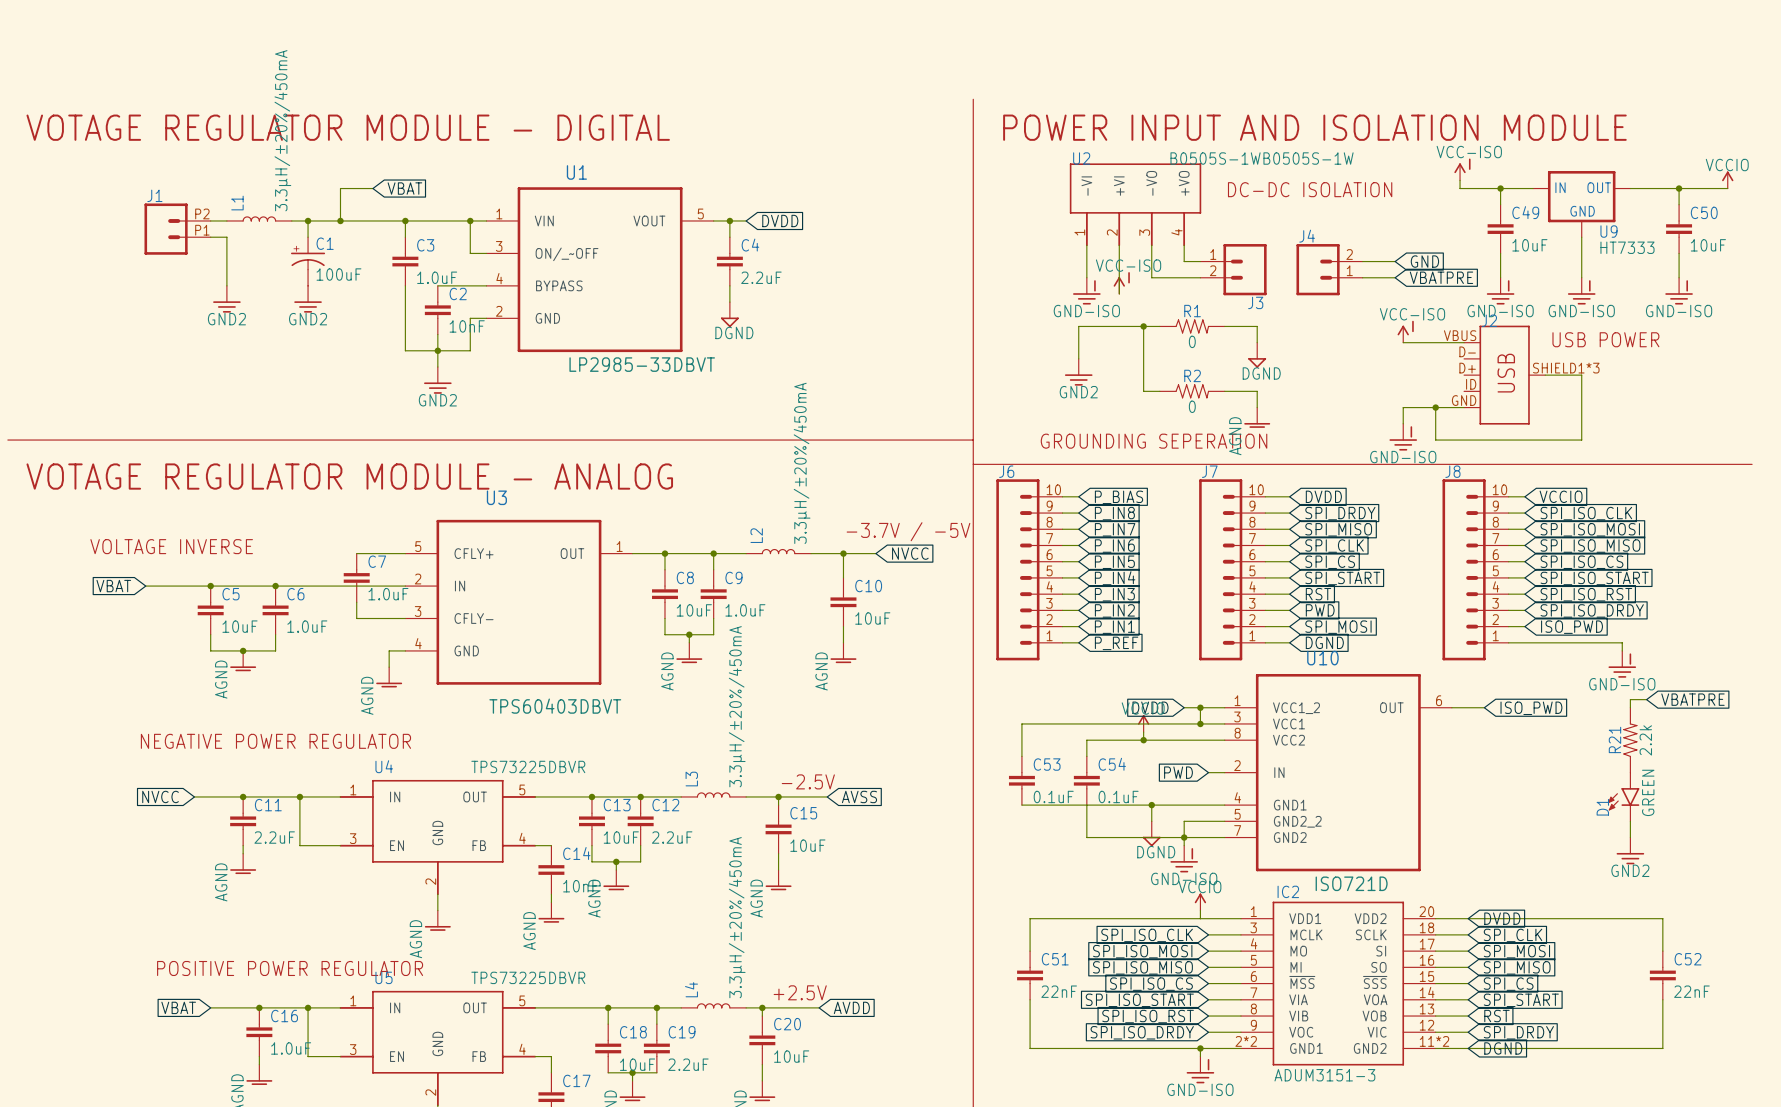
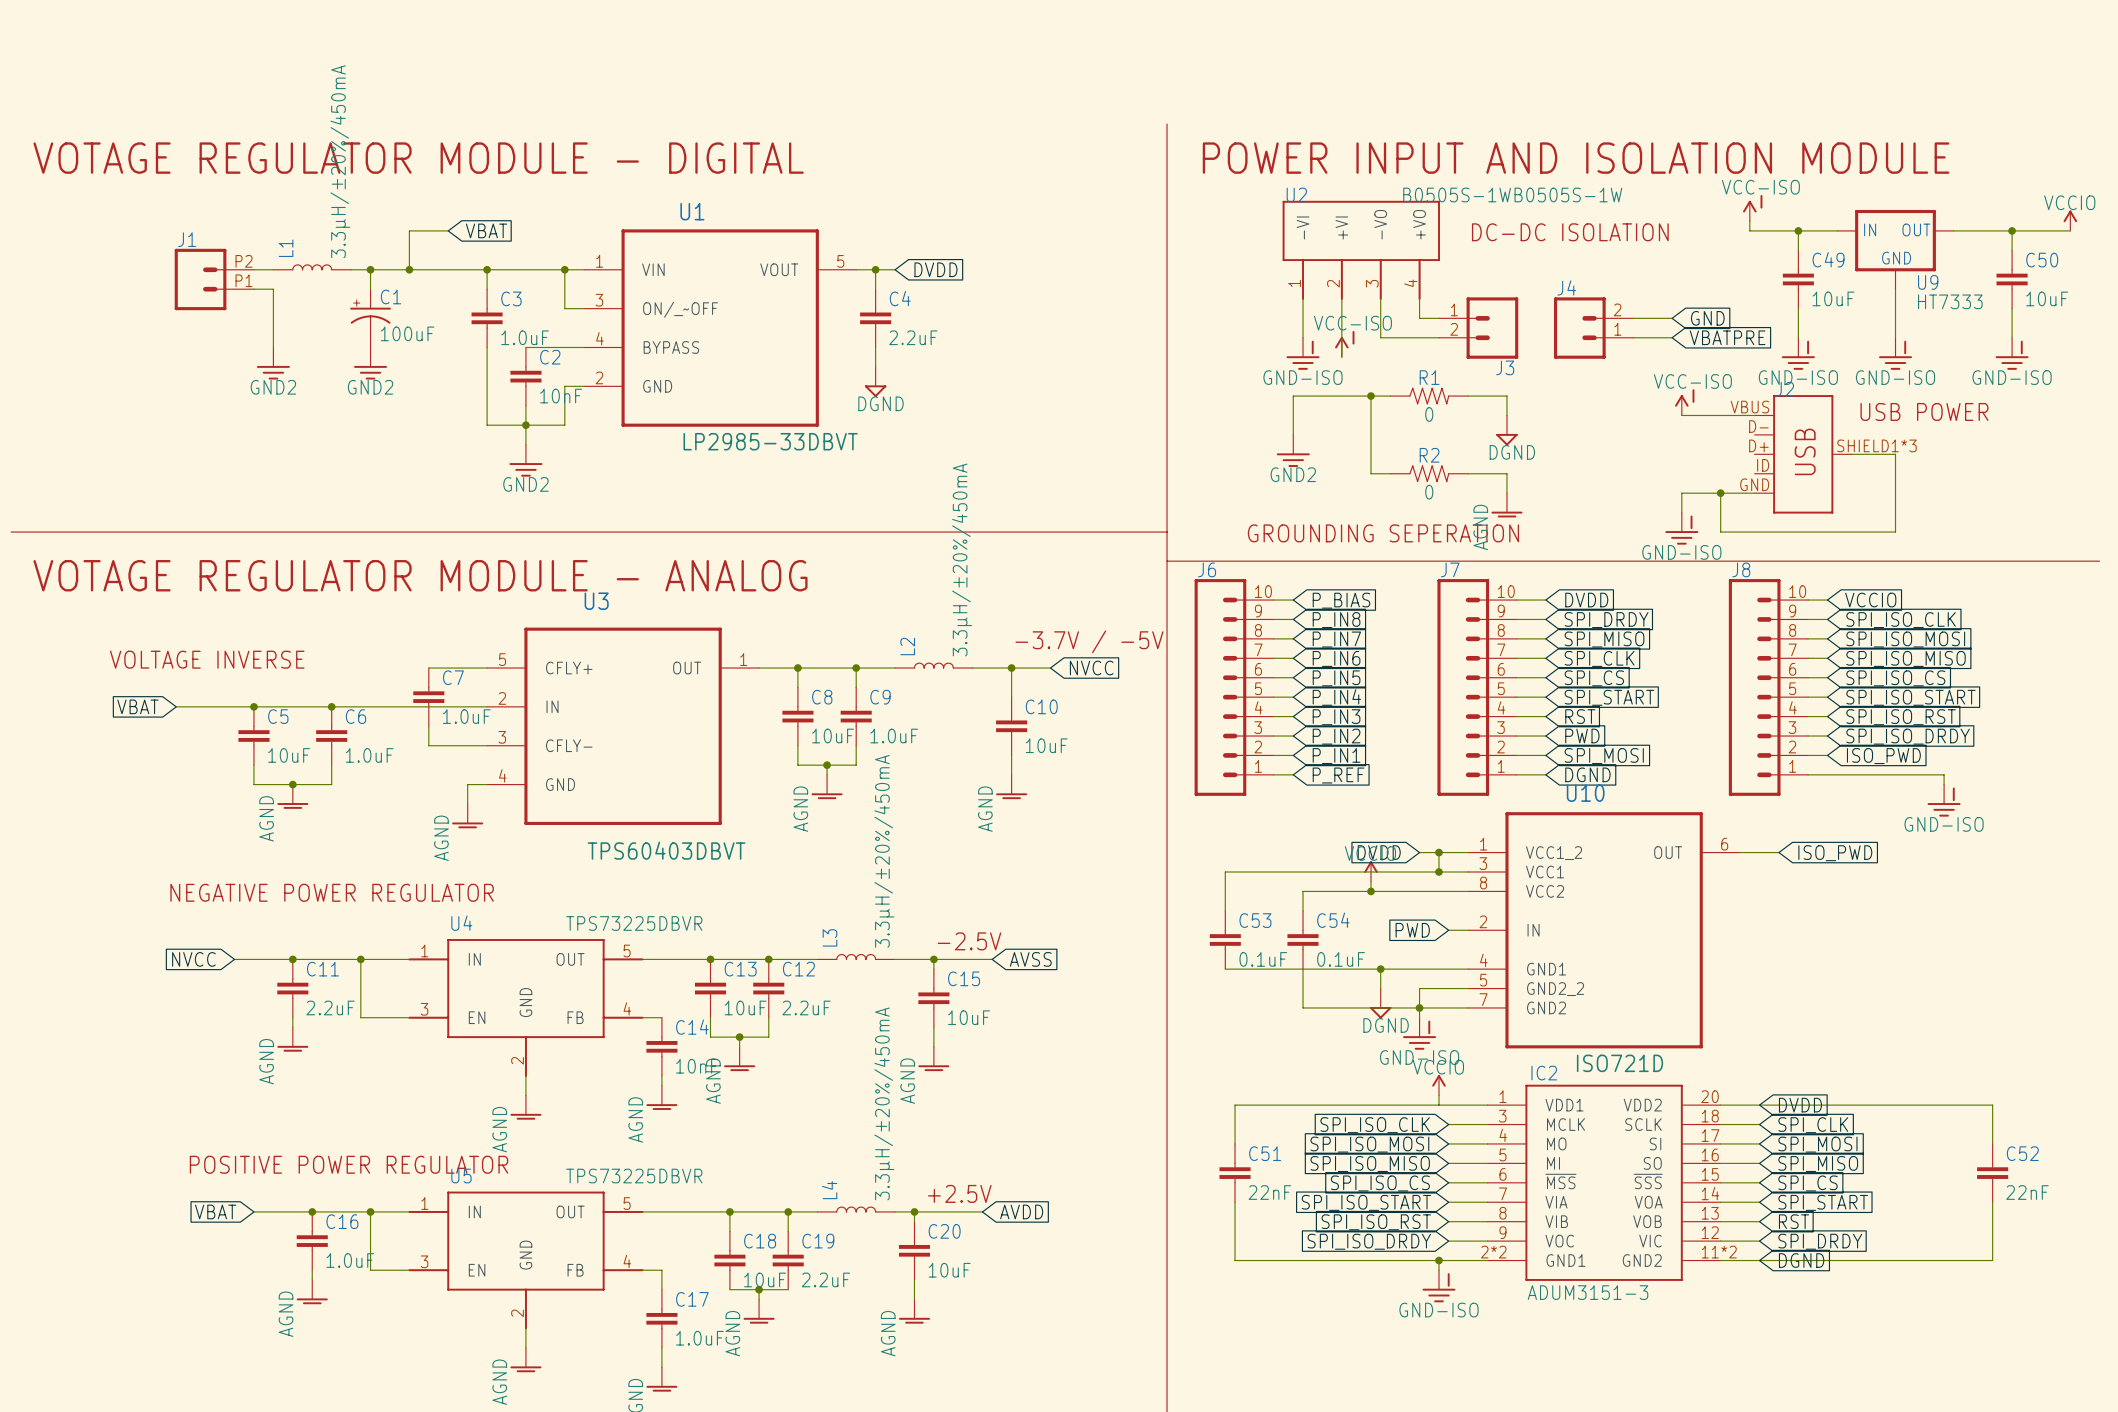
wire: (1646, 699) (1630, 699) (1630, 707) -> none
global label: VBATPRE (1692, 699) -> none
R21: 2.2k (1630, 740) -> none
D1: GREEN (1623, 796) -> none
wire: (1630, 821) (1630, 837) -> none
power symbol: GND2 (1630, 850) -> none

